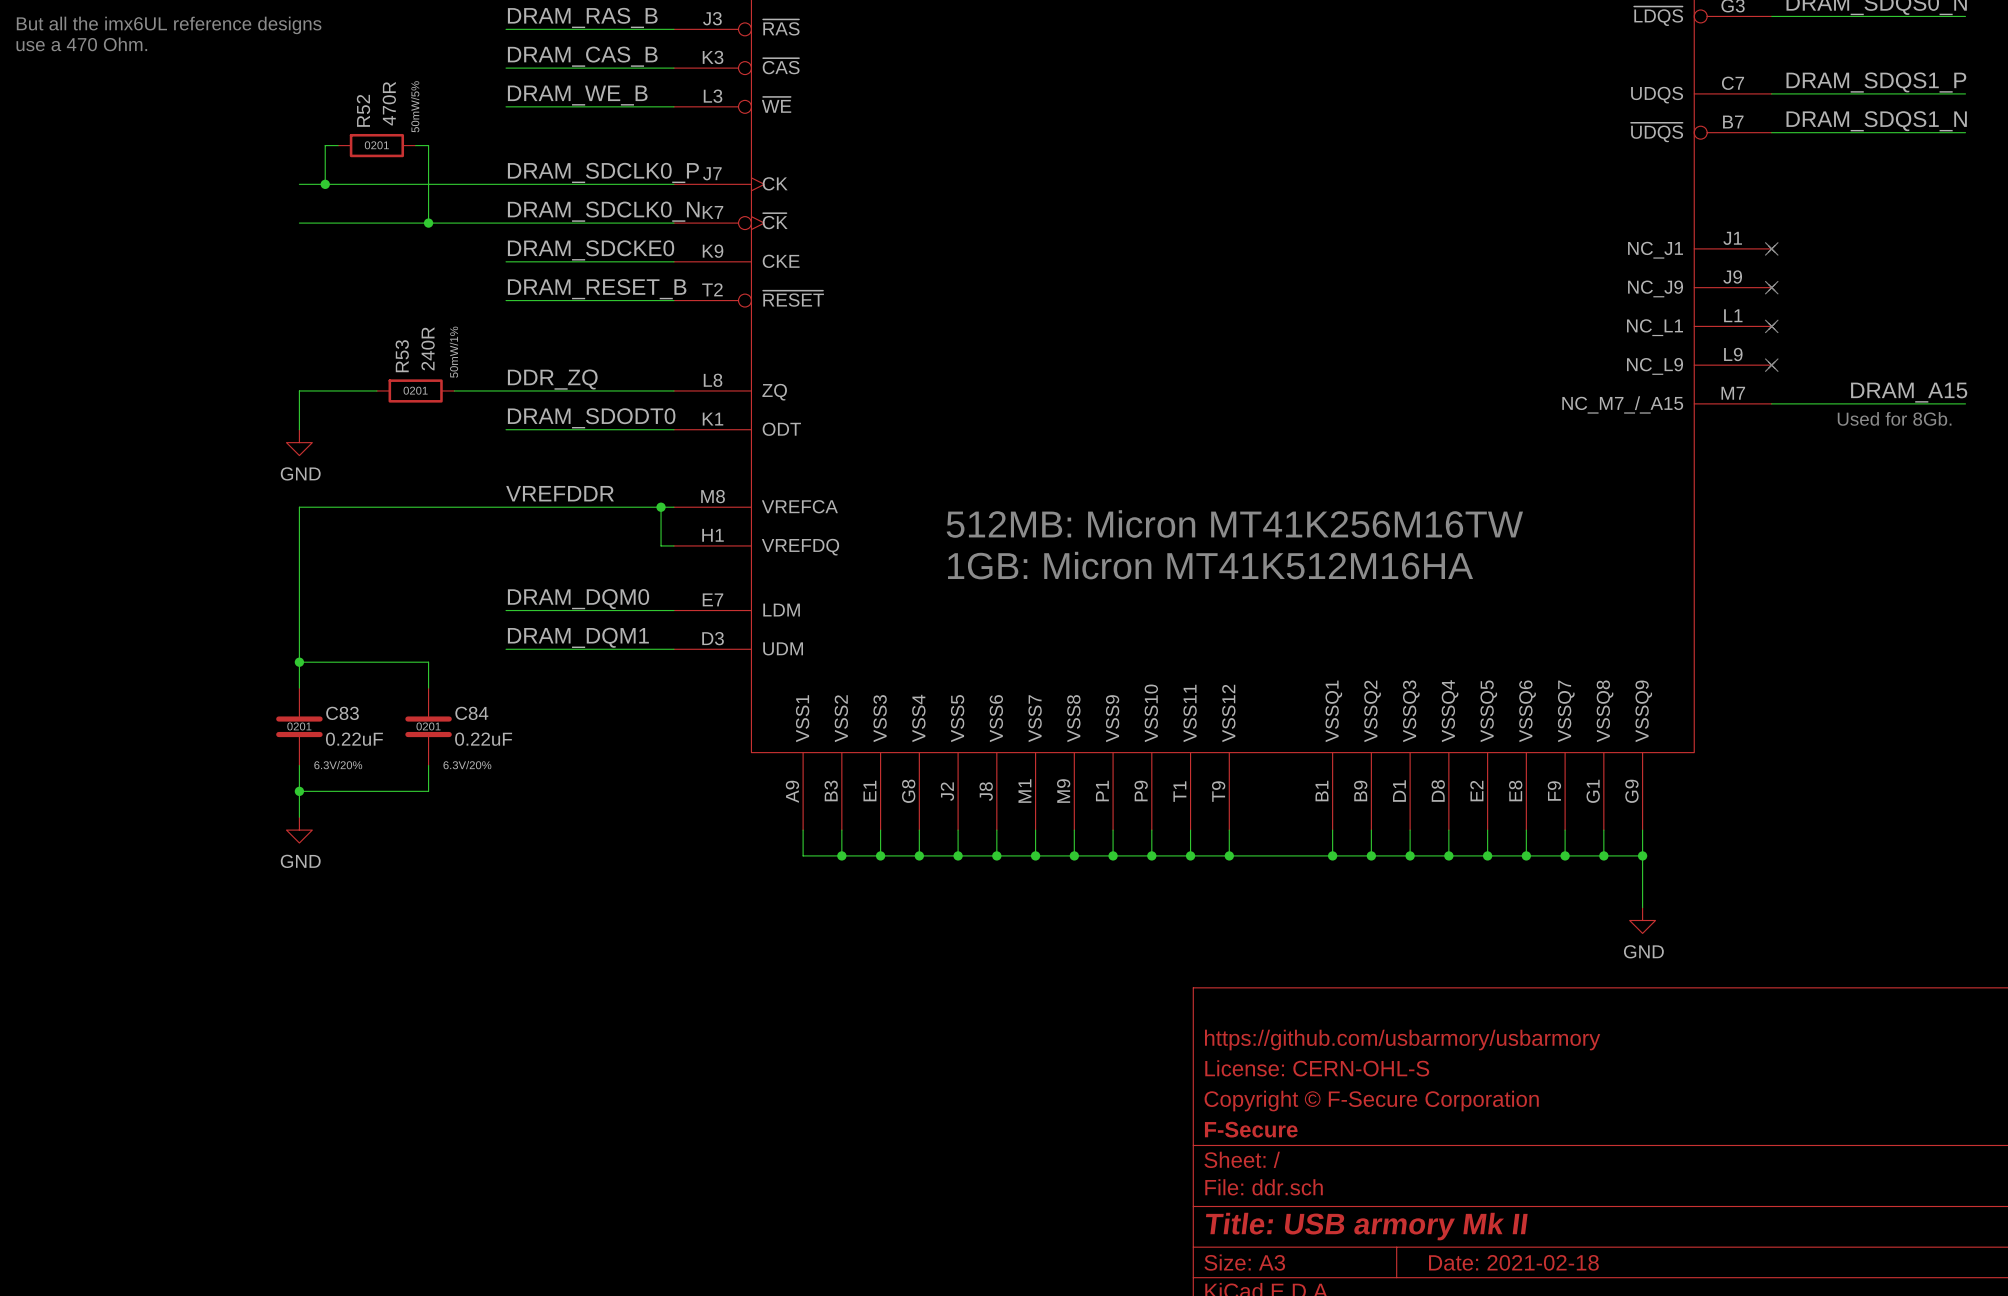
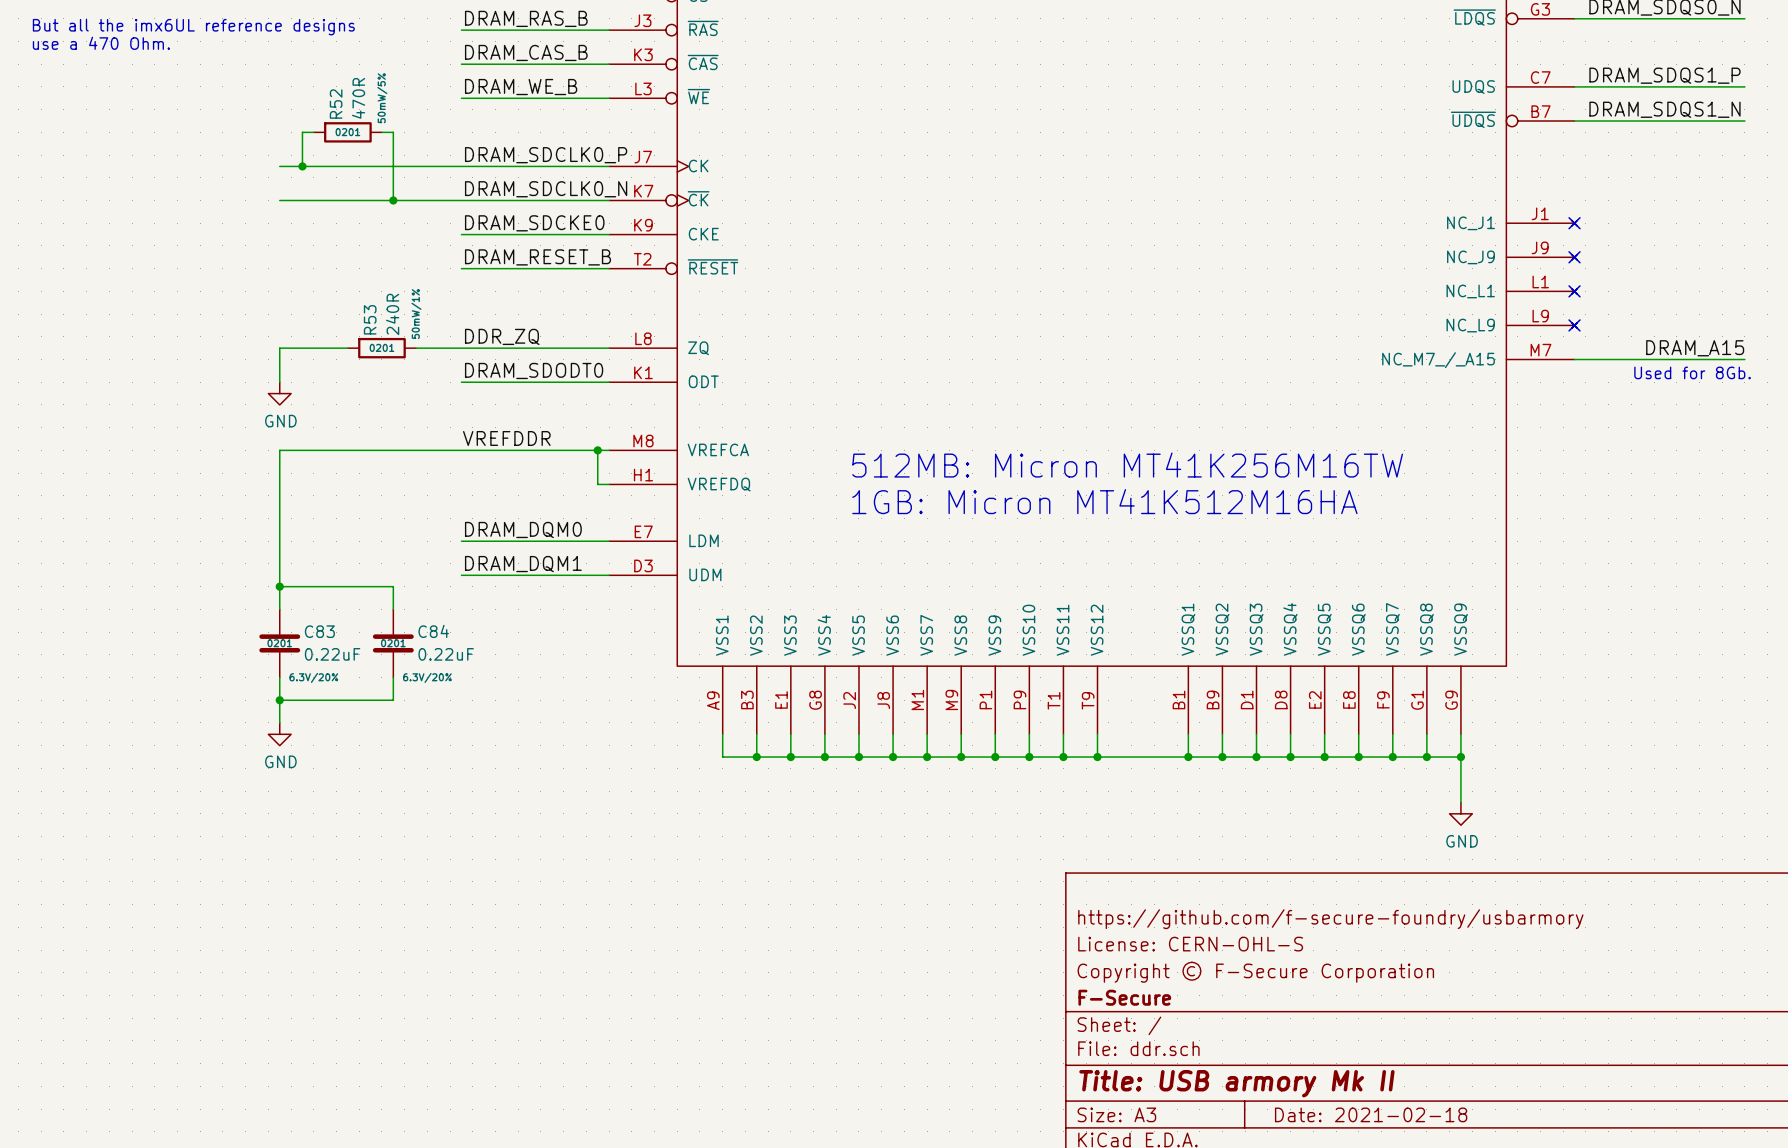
title block: https://github.com/usbarmory/usbarmory (1402, 1040) -> https://github.com/f-secure-foundry/usbarmory (1330, 919)

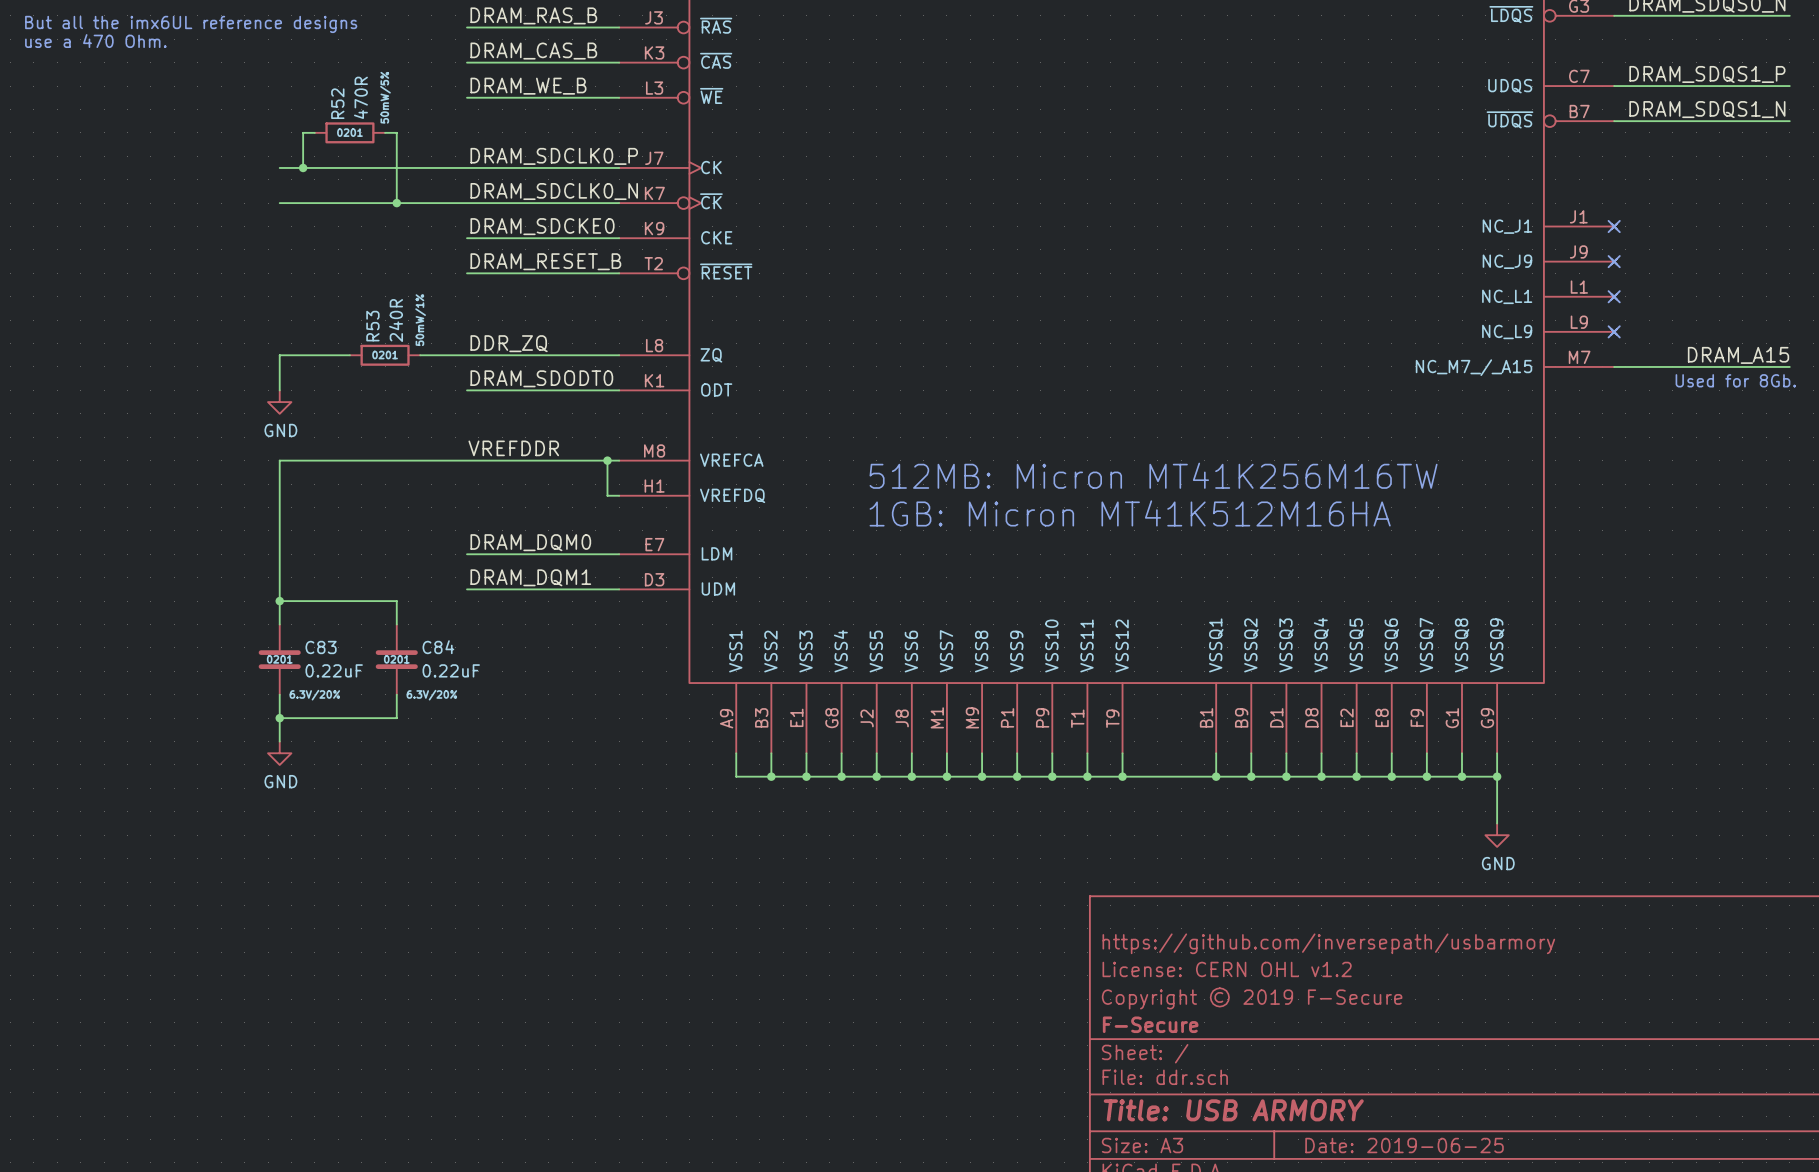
title block: https://github.com/f-secure-foundry/usbarmory (1330, 919) -> https://github.com/inversepath/usbarmory (1328, 943)
title block: License: CERN-OHL-S (1190, 944) -> License: CERN OHL v1.2 (1227, 969)
title block: Copyright © F-Secure Corporation (1255, 972) -> Copyright © 2019 F-Secure (1252, 998)
title block: Title: USB armory Mk II (1236, 1083) -> Title: USB ARMORY (1233, 1110)
title block: Date: 2021-02-18 (1371, 1114) -> Date: 2019-06-25 (1404, 1145)

